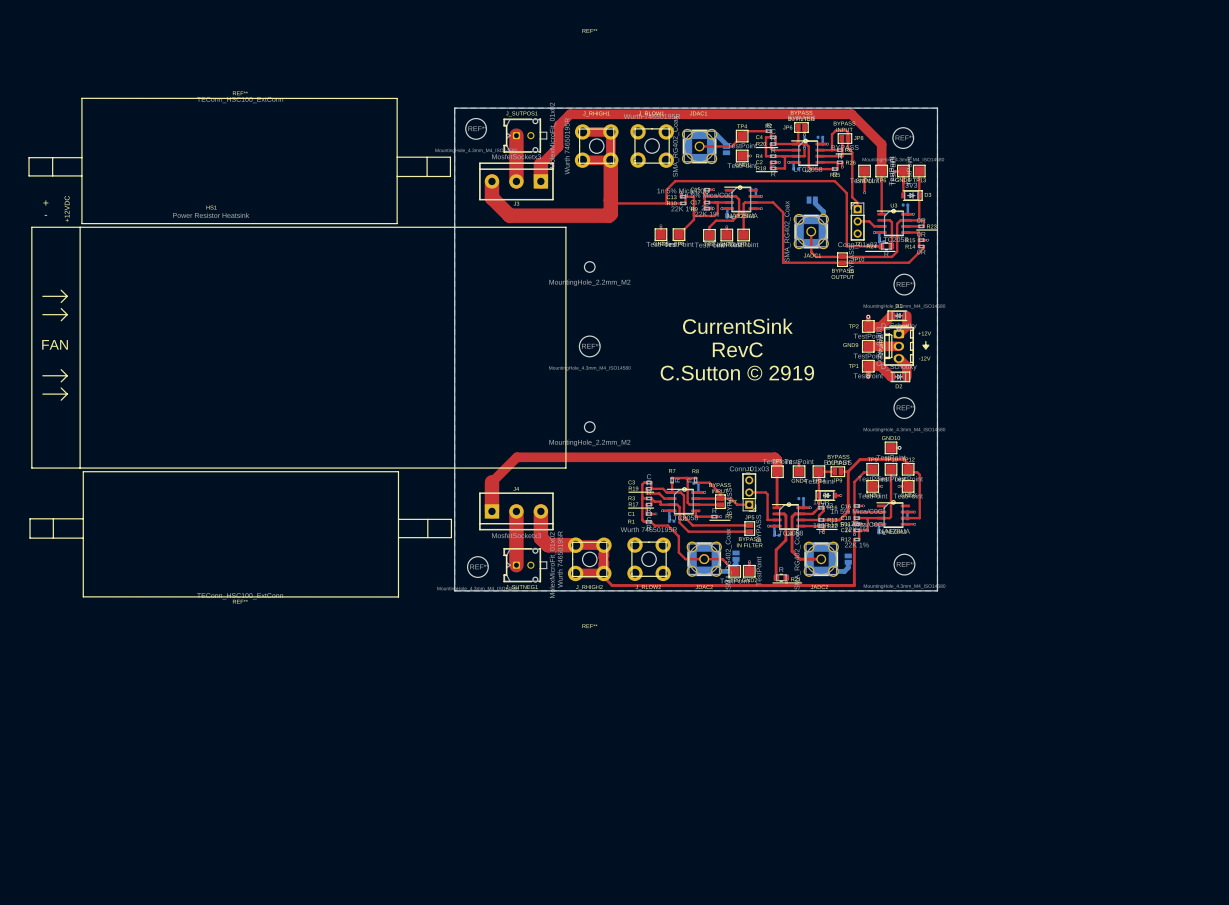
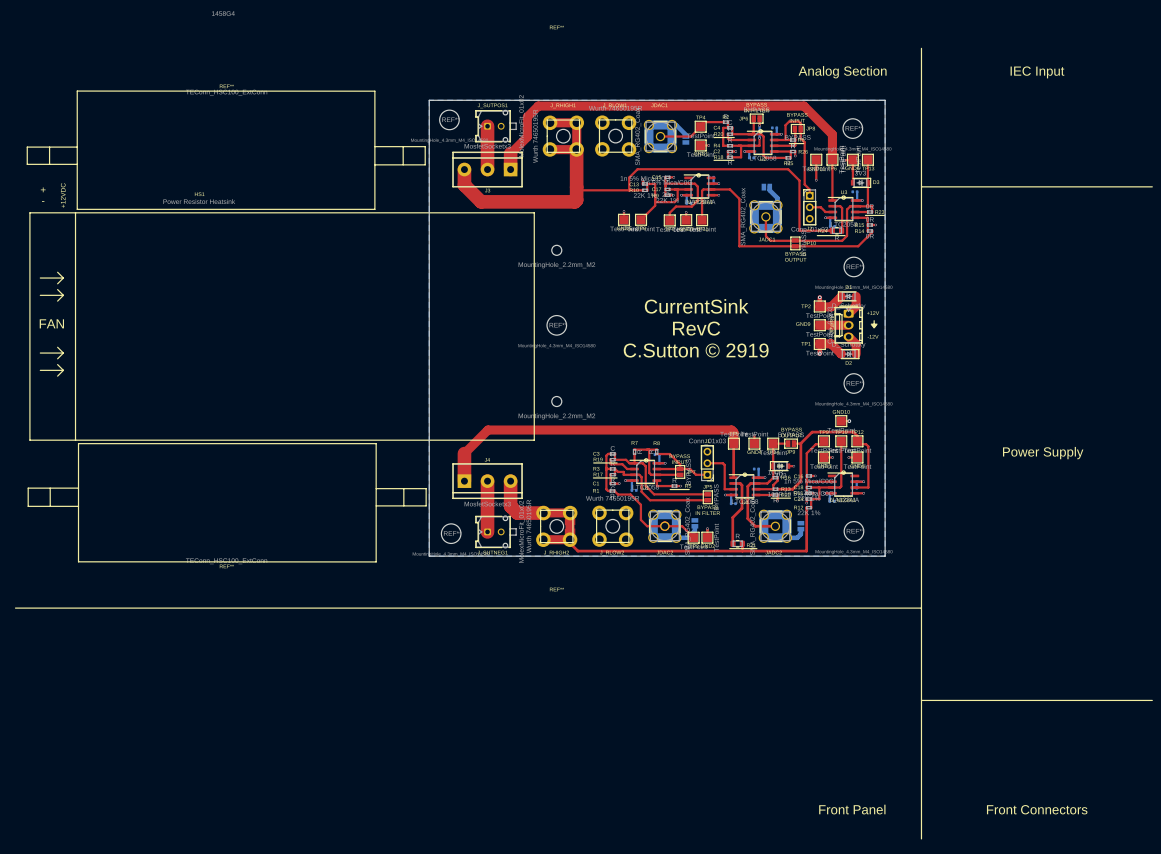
drawing: none -> [15, 48, 1153, 840]

